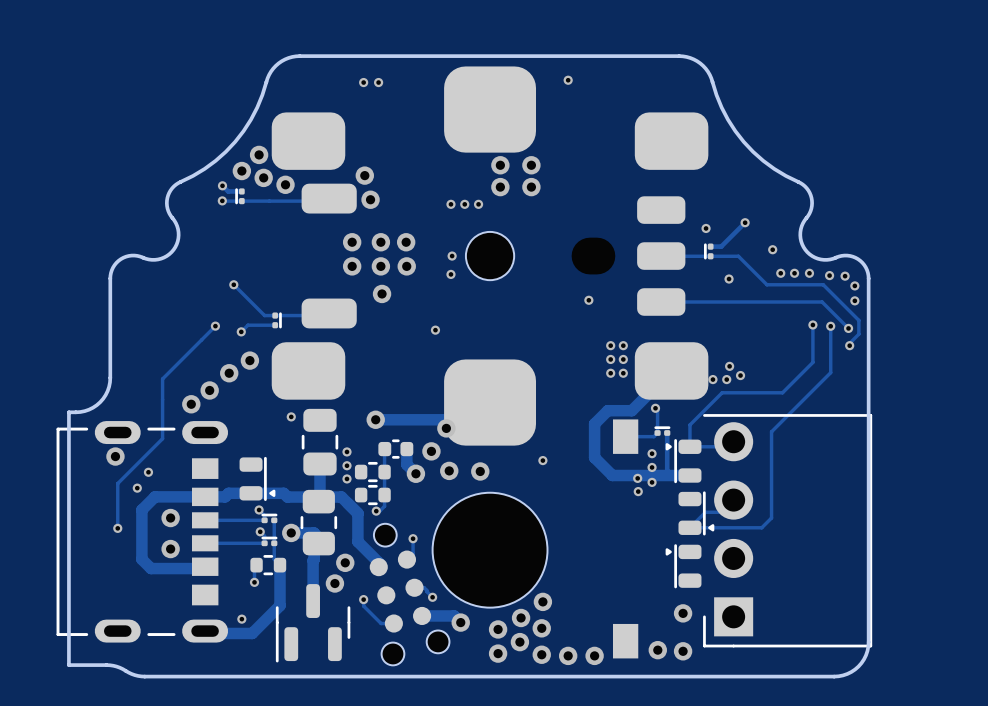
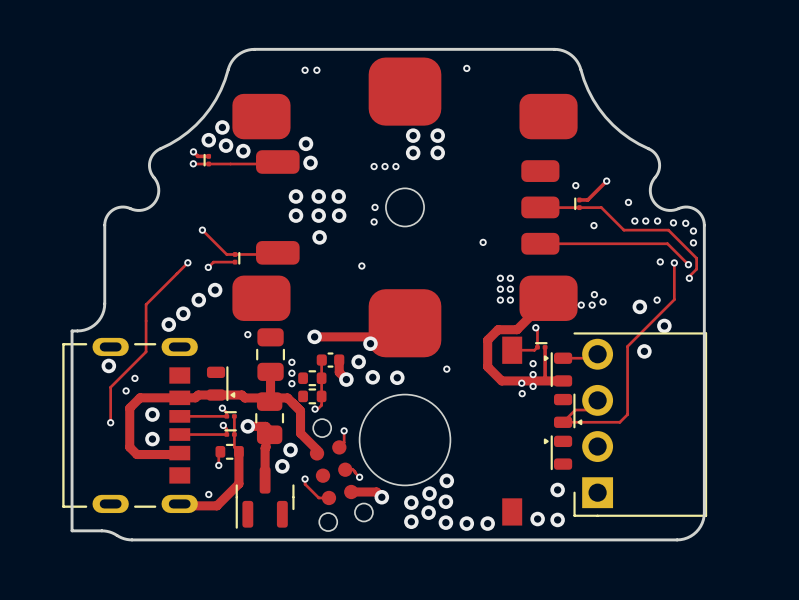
track: (812, 324) (812, 362) (782, 392) (722, 392) (689, 424) (689, 446) -> none
via: none -> (657, 300)
via: none -> (639, 306)
via: none -> (664, 325)
via: none -> (644, 351)

